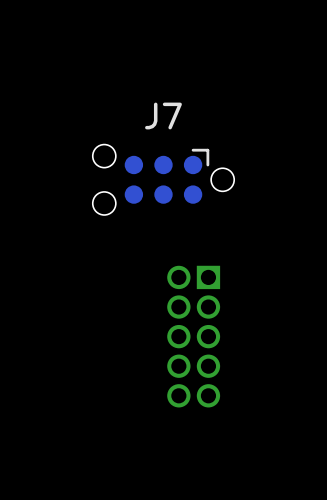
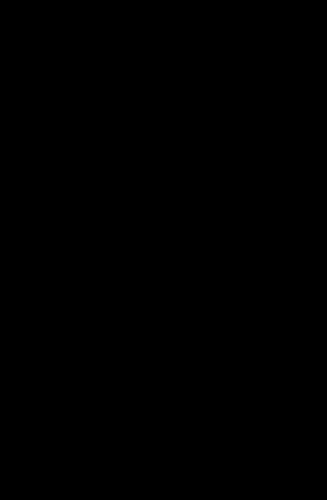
J7: (163, 179) -> none
part: (193, 336) -> none

